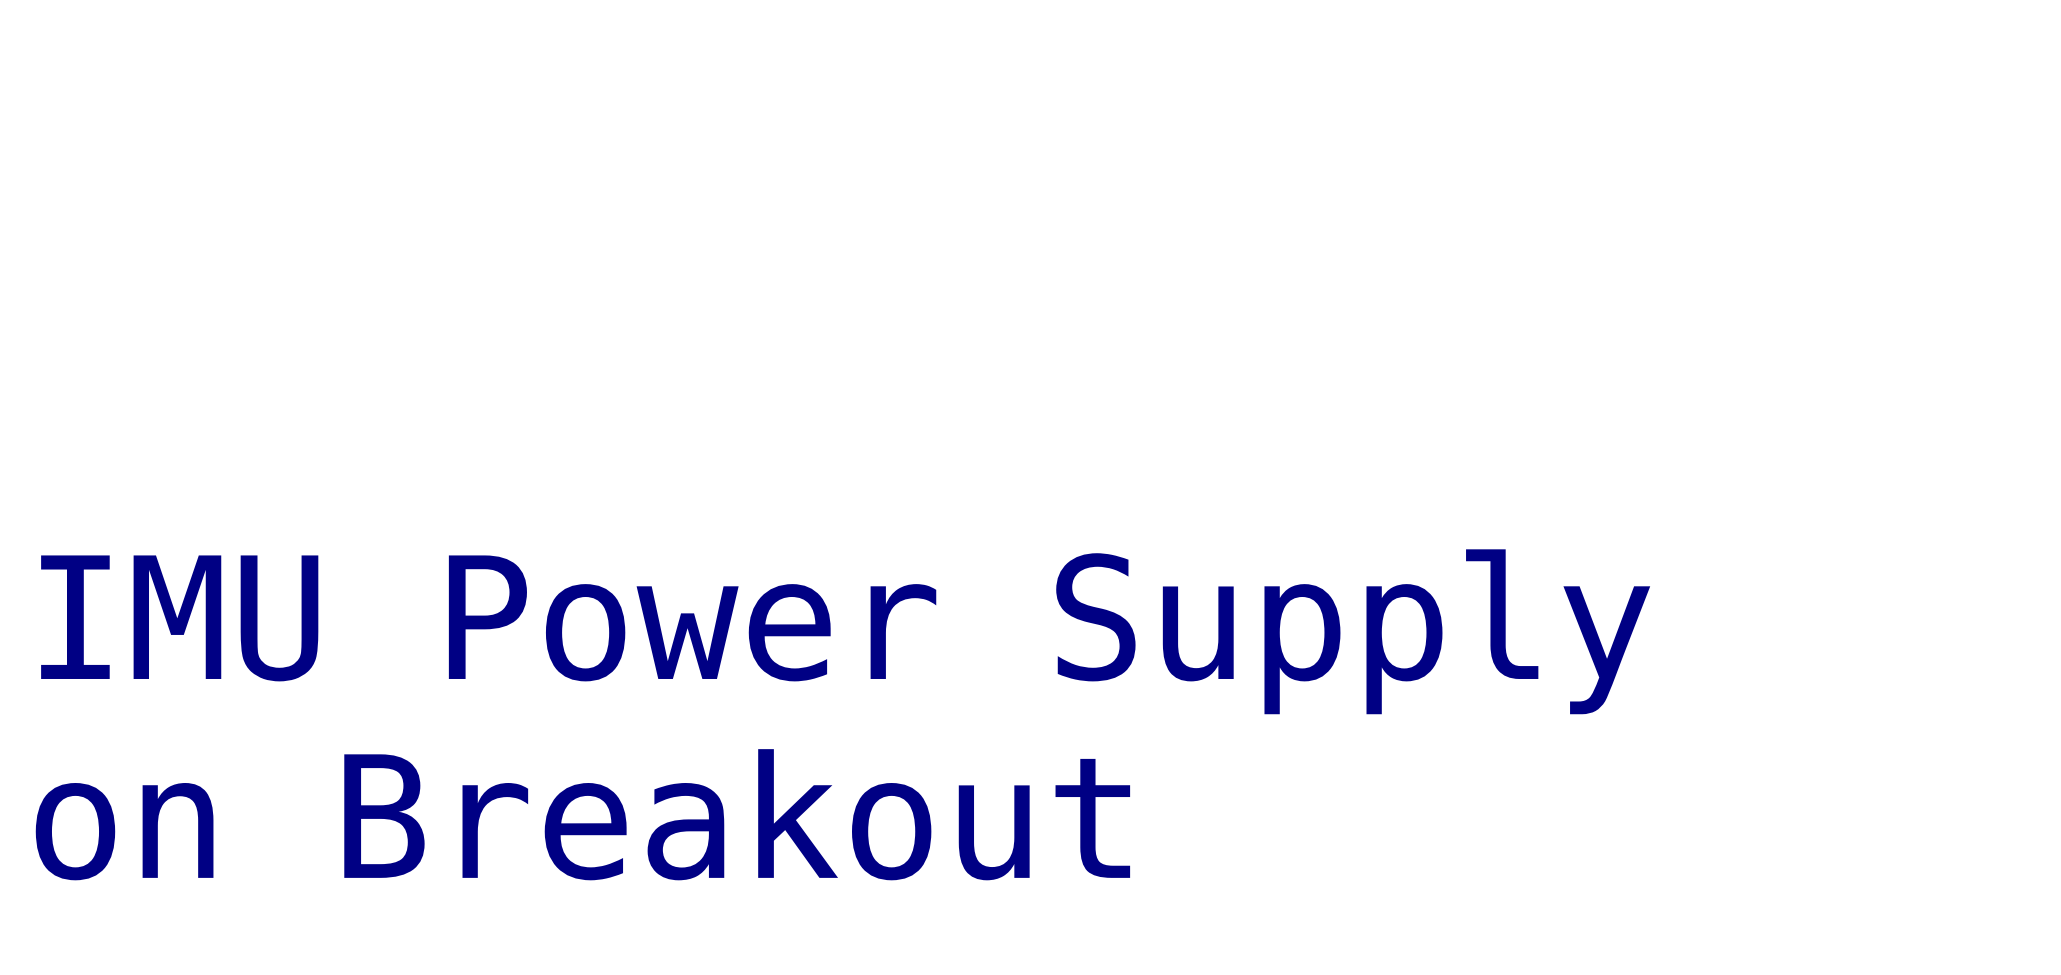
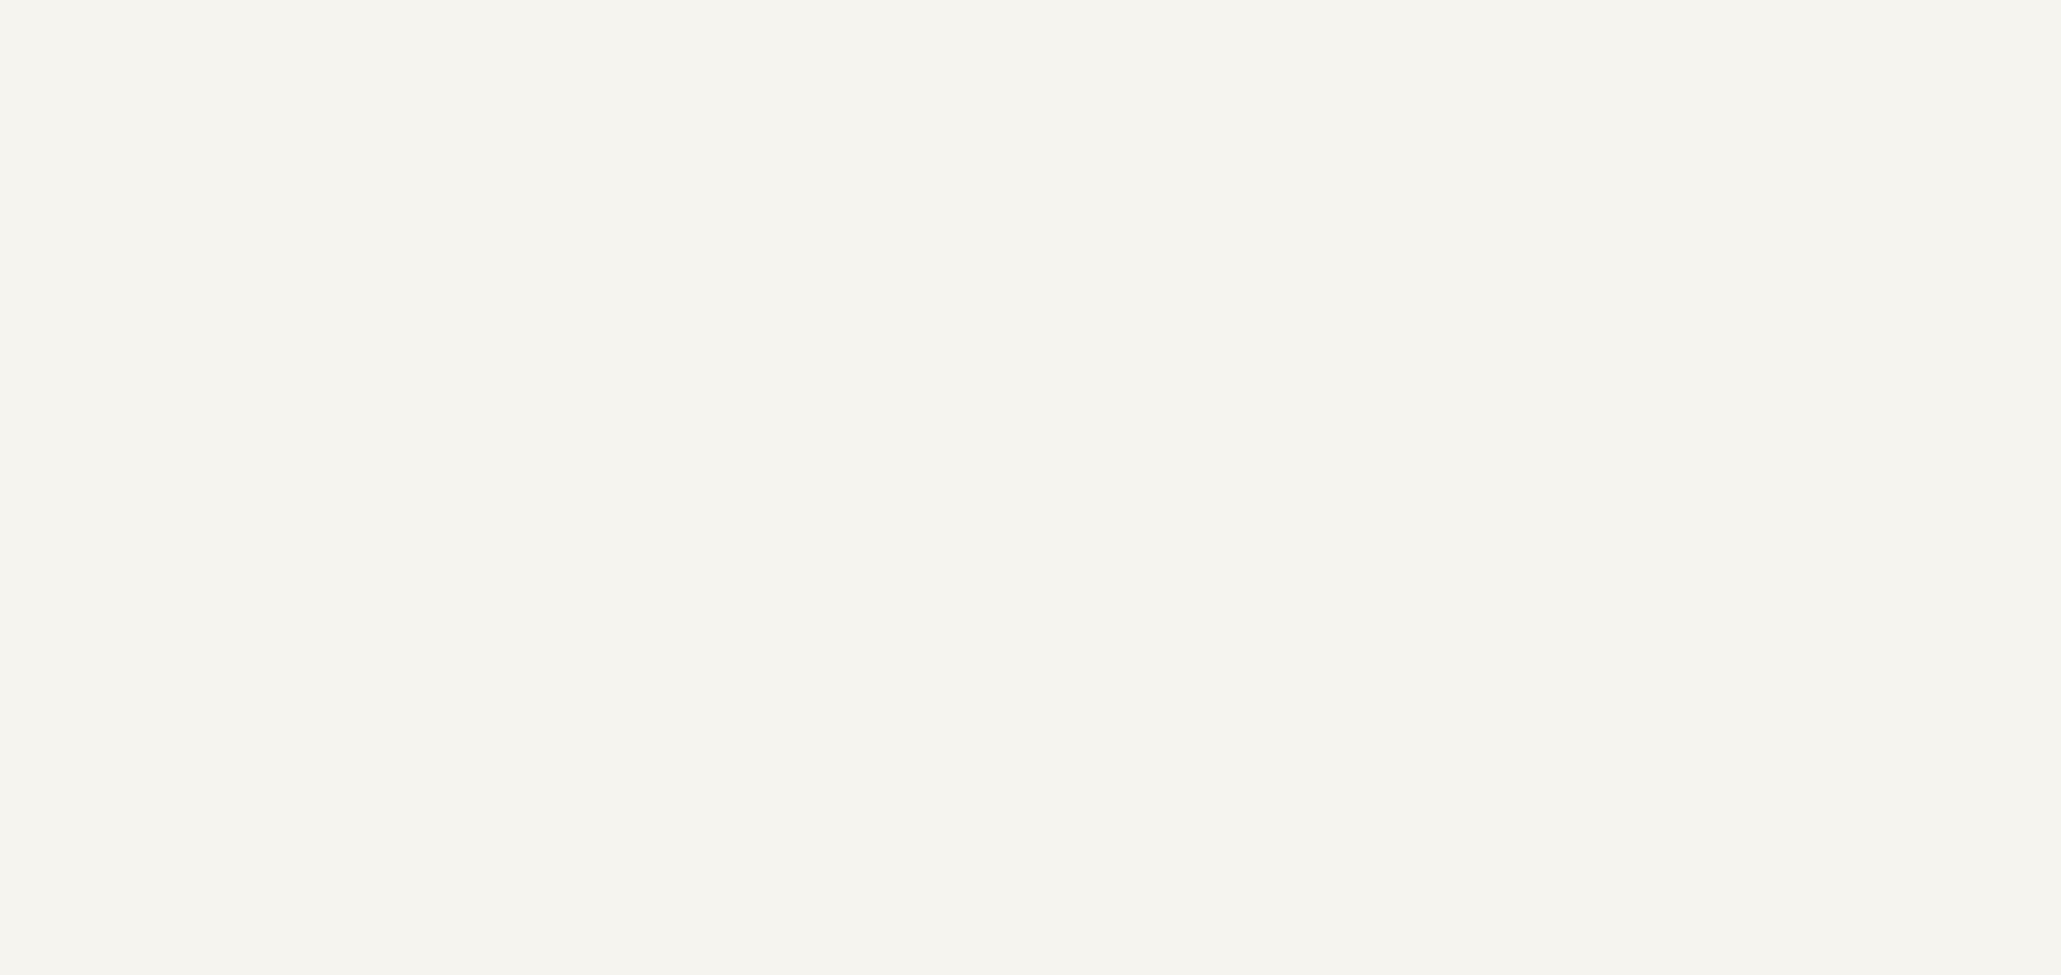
text: IMU Power Supply (845, 631) -> none
text: on Breakout (582, 814) -> none

